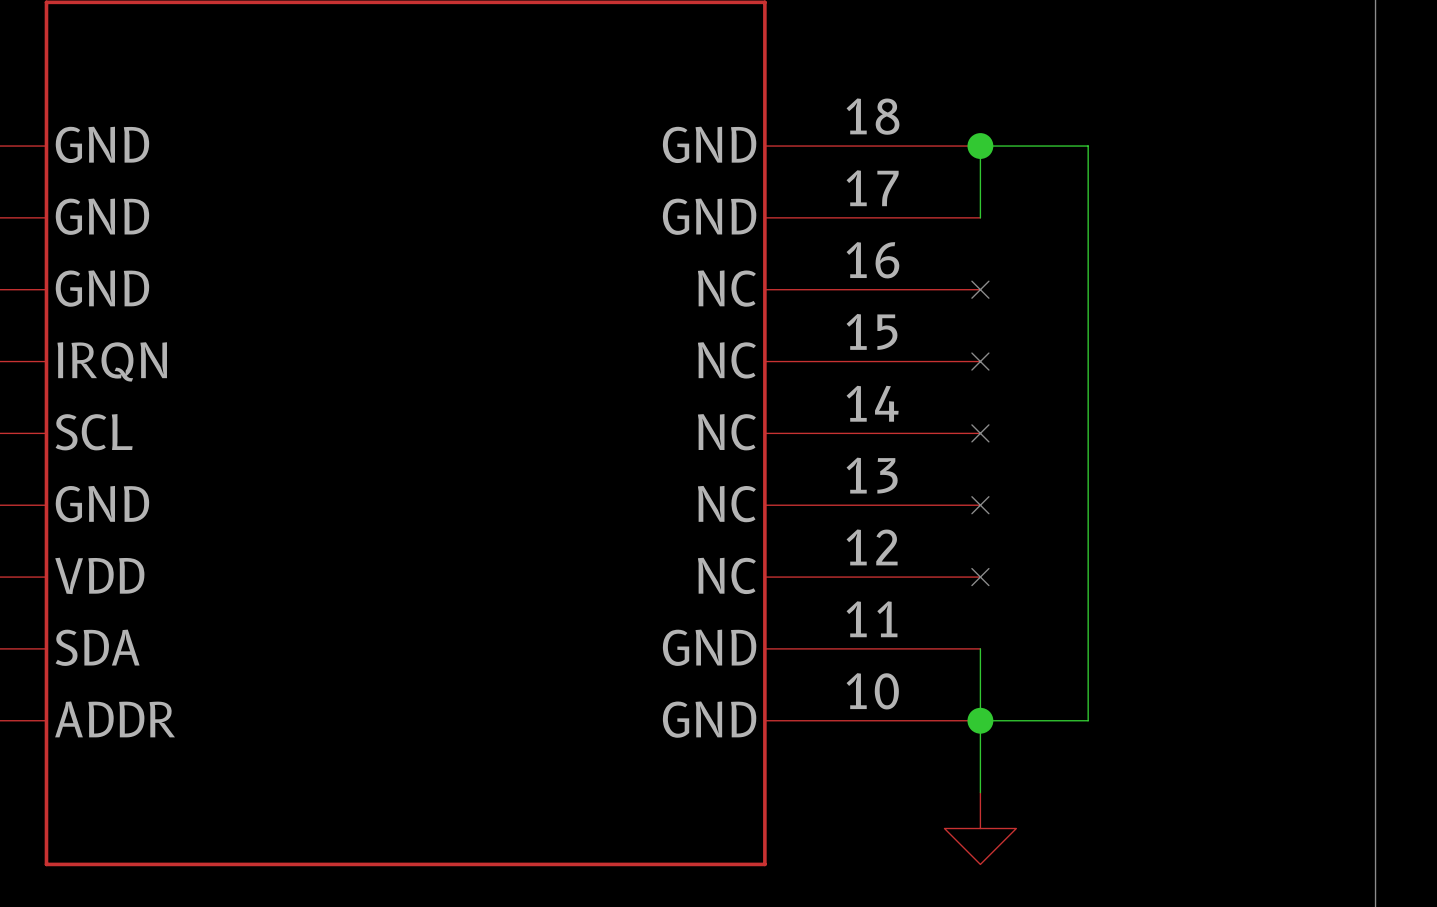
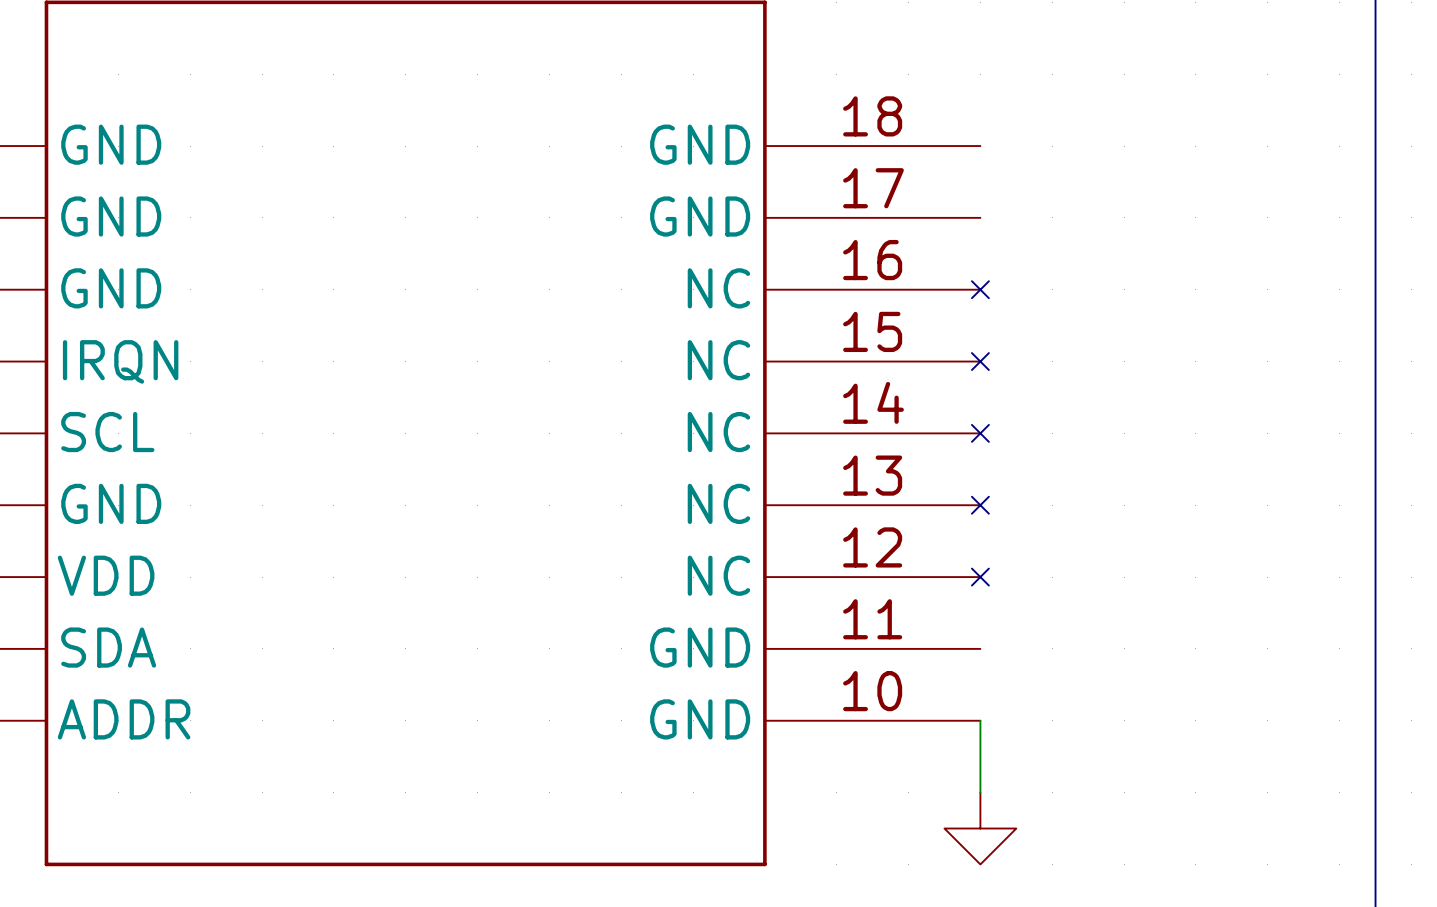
junction: (980, 146) -> none
wire: (980, 217) (980, 146) (1088, 146) (1088, 720) (980, 720) (980, 648) -> none
junction: (980, 720) -> none

